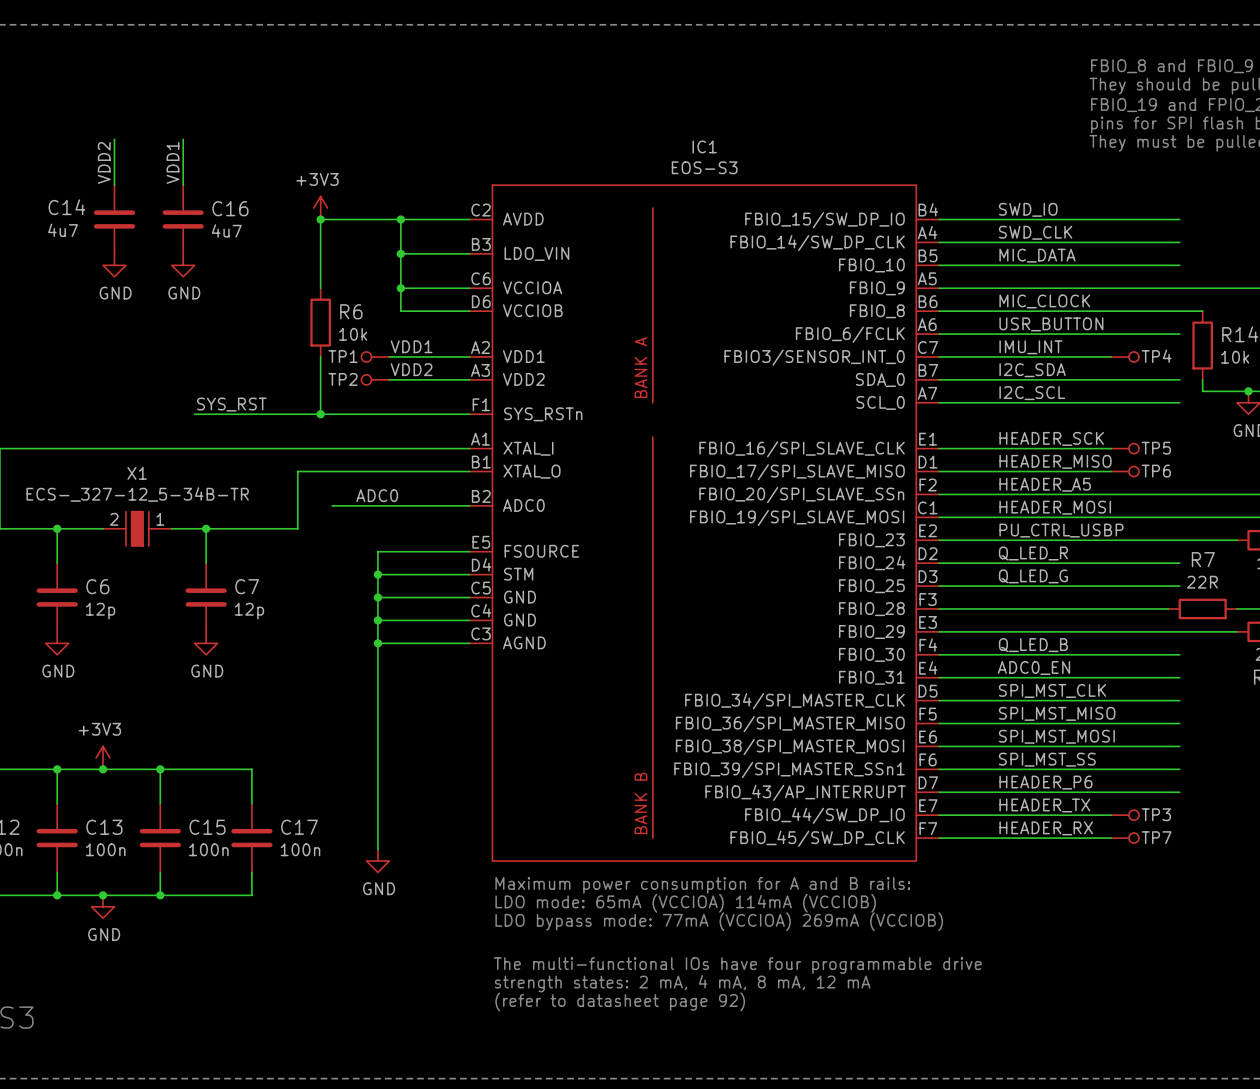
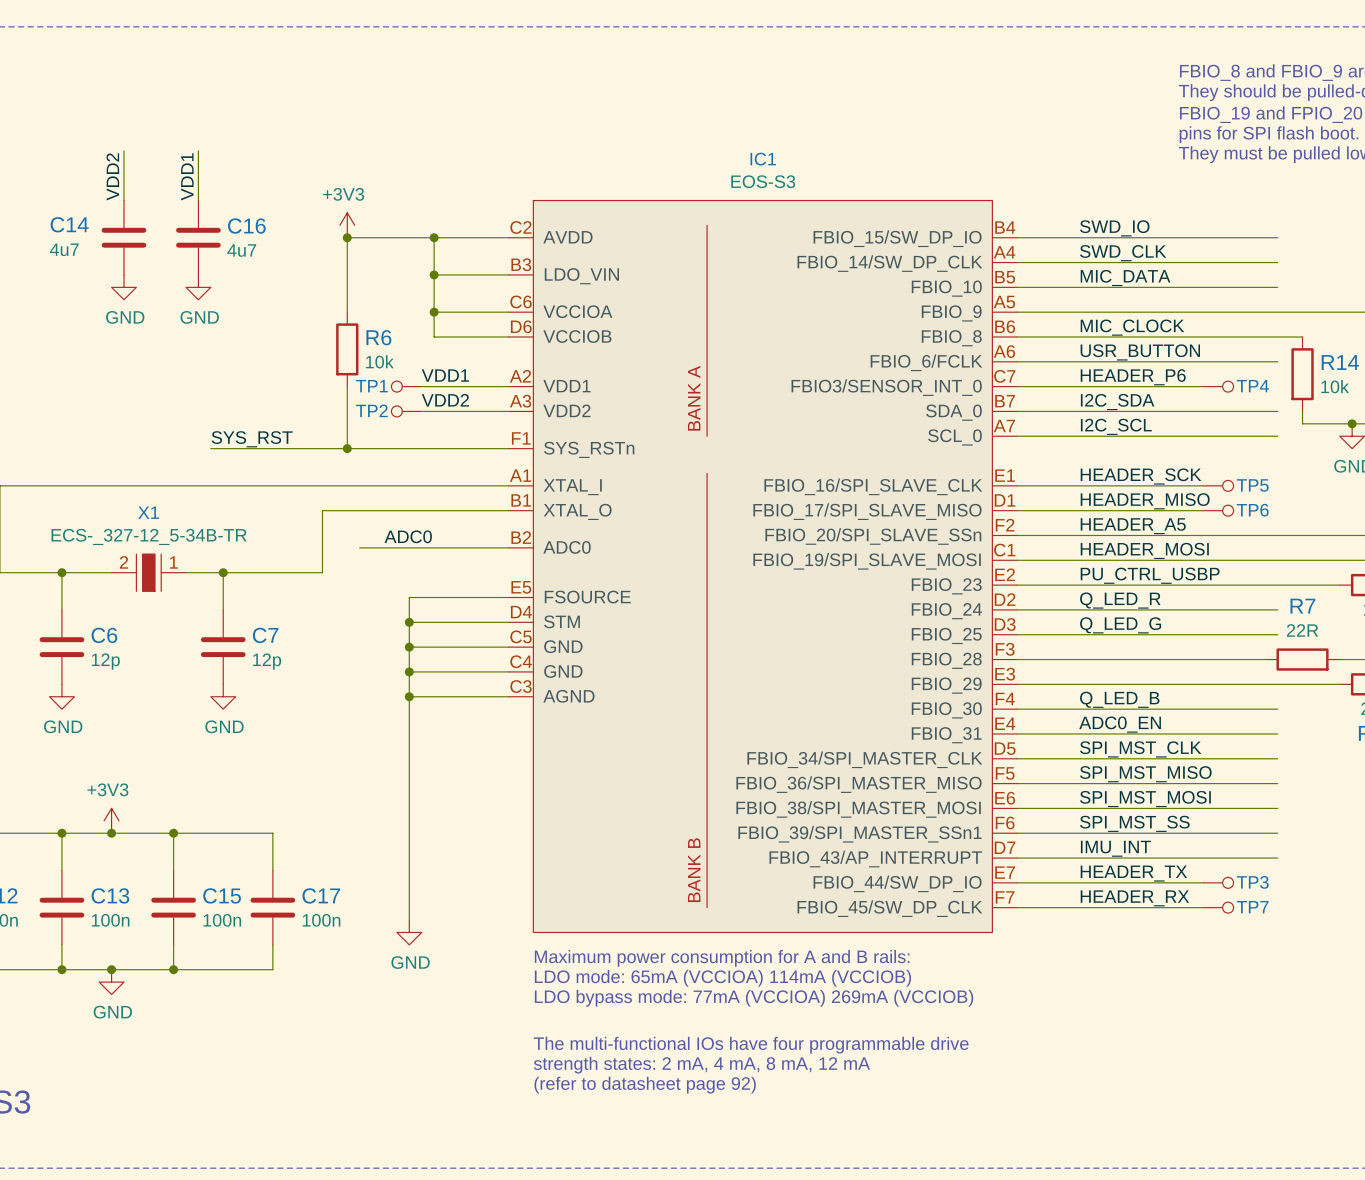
label: IMU_INT (1030, 347) -> HEADER_P6 (1133, 377)
label: HEADER_P6 (1045, 782) -> IMU_INT (1115, 848)

